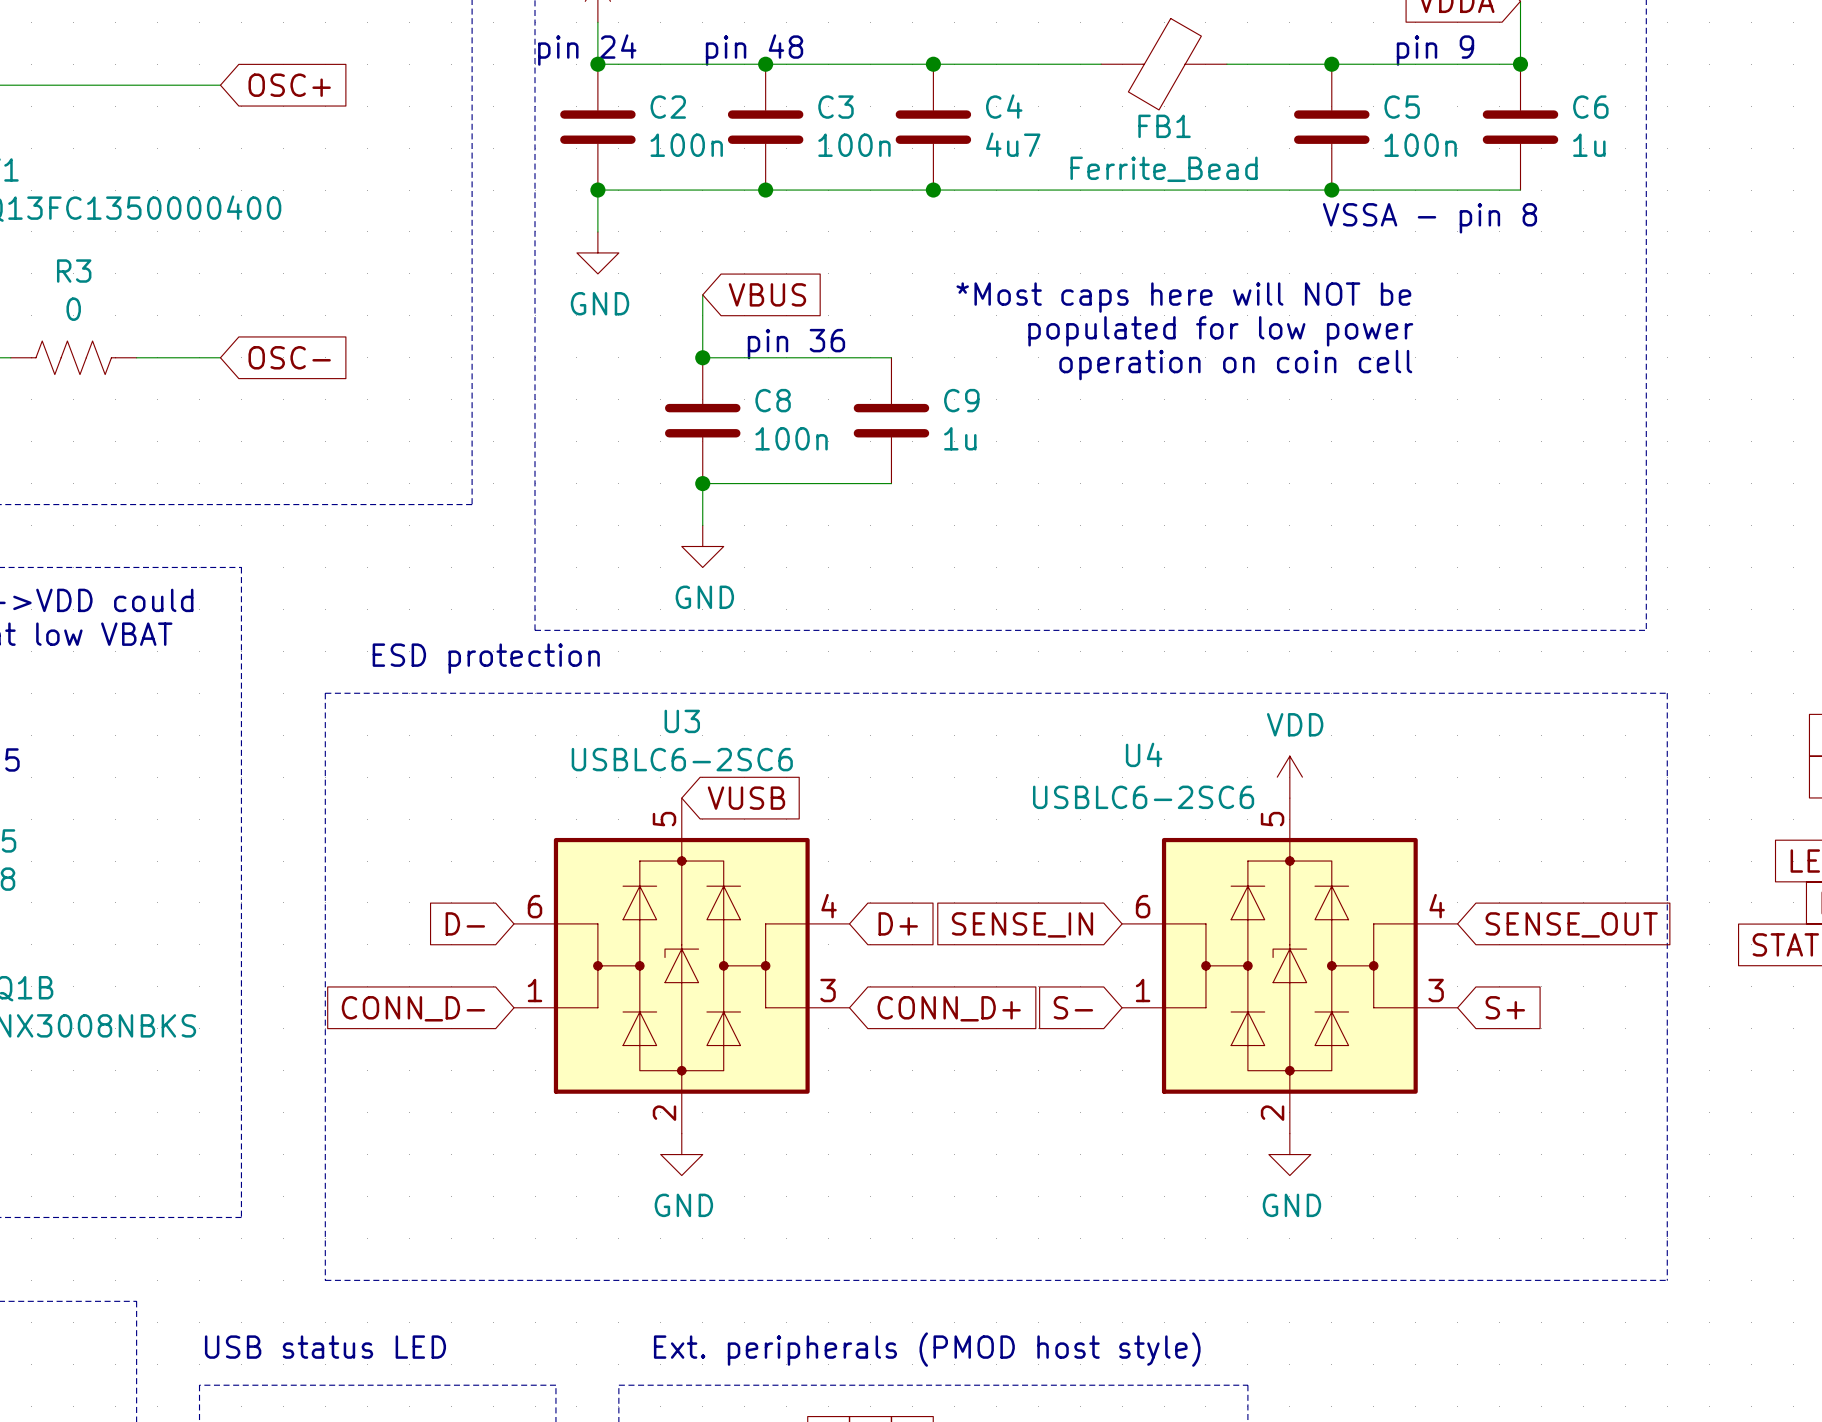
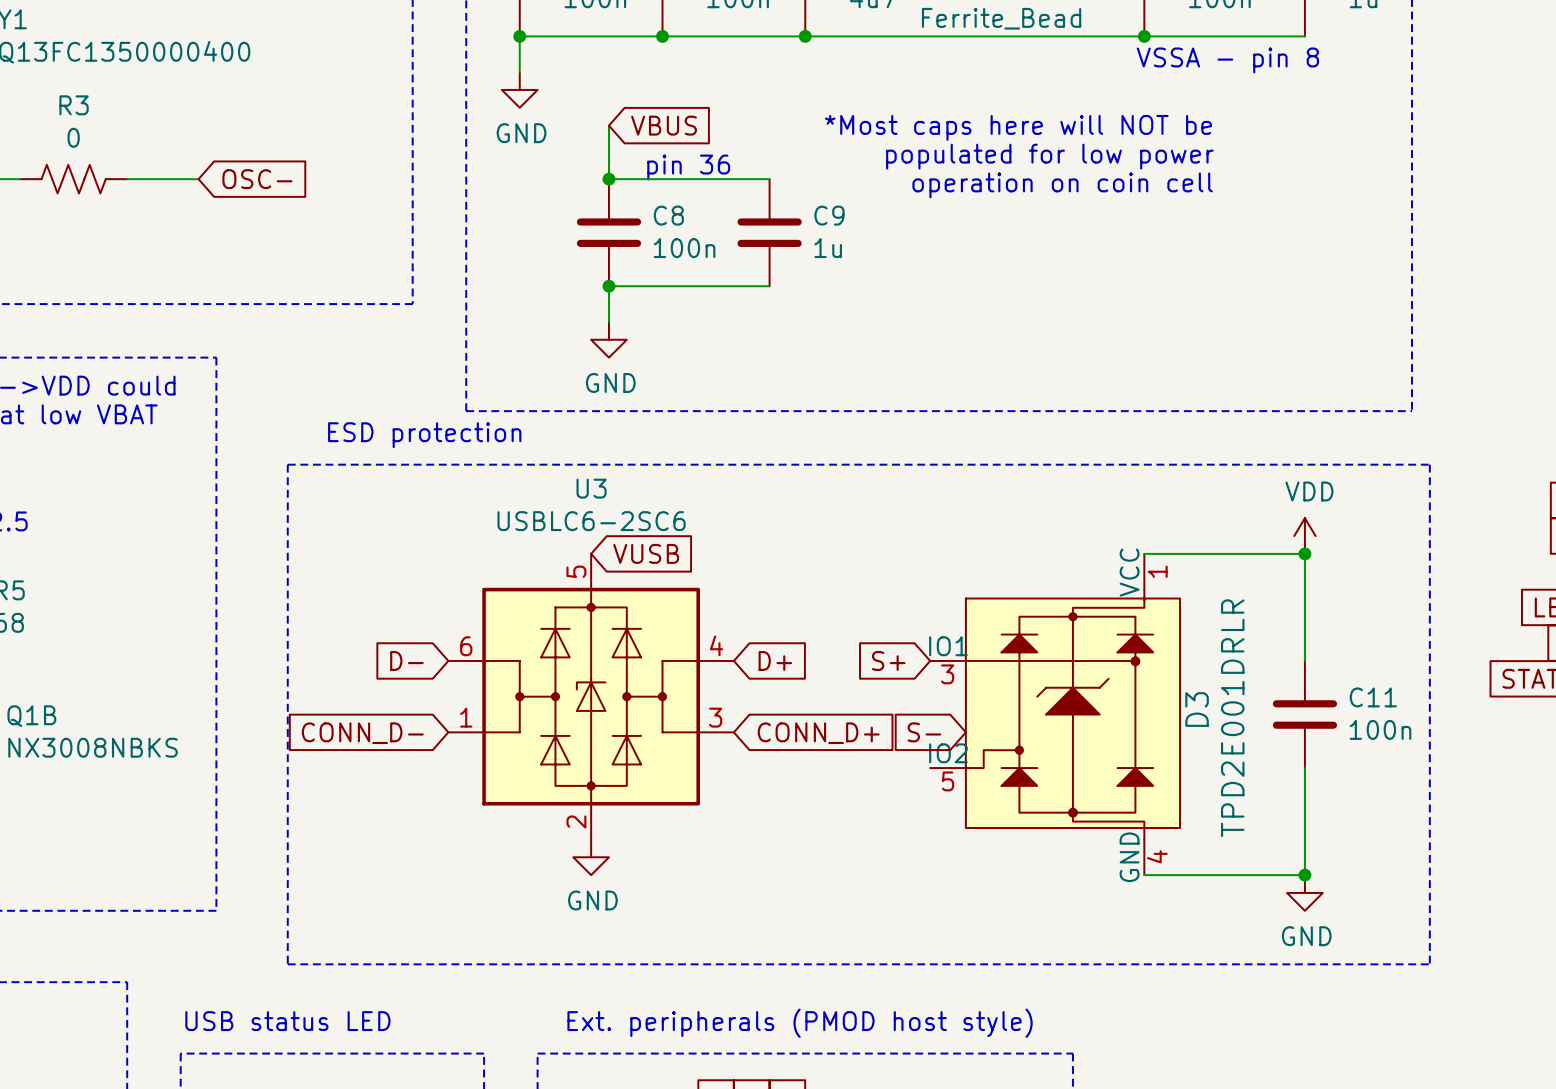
power symbol position: VDD (1289, 777) -> VDD (1304, 536)
wire: none -> (1144, 553) (1304, 553) (1304, 660)
junction: none -> (1304, 553)
global label: SENSE_IN (1022, 924) -> none
global label: SENSE_OUT (1571, 924) -> none
U4: USBLC6-2SC6 (1289, 965) -> none
D3: none -> TPD2E001DRLR (1055, 714)
C11: none -> 100n (1304, 714)
global label rotation: 0° (1505, 1007) -> 180° (888, 660)
global label position: S+ (1505, 1007) -> S+ (888, 660)
wire: none -> (1304, 768) (1304, 875) (1144, 875)
power symbol position: GND (1289, 1154) -> GND (1304, 892)
junction: none -> (1304, 875)

